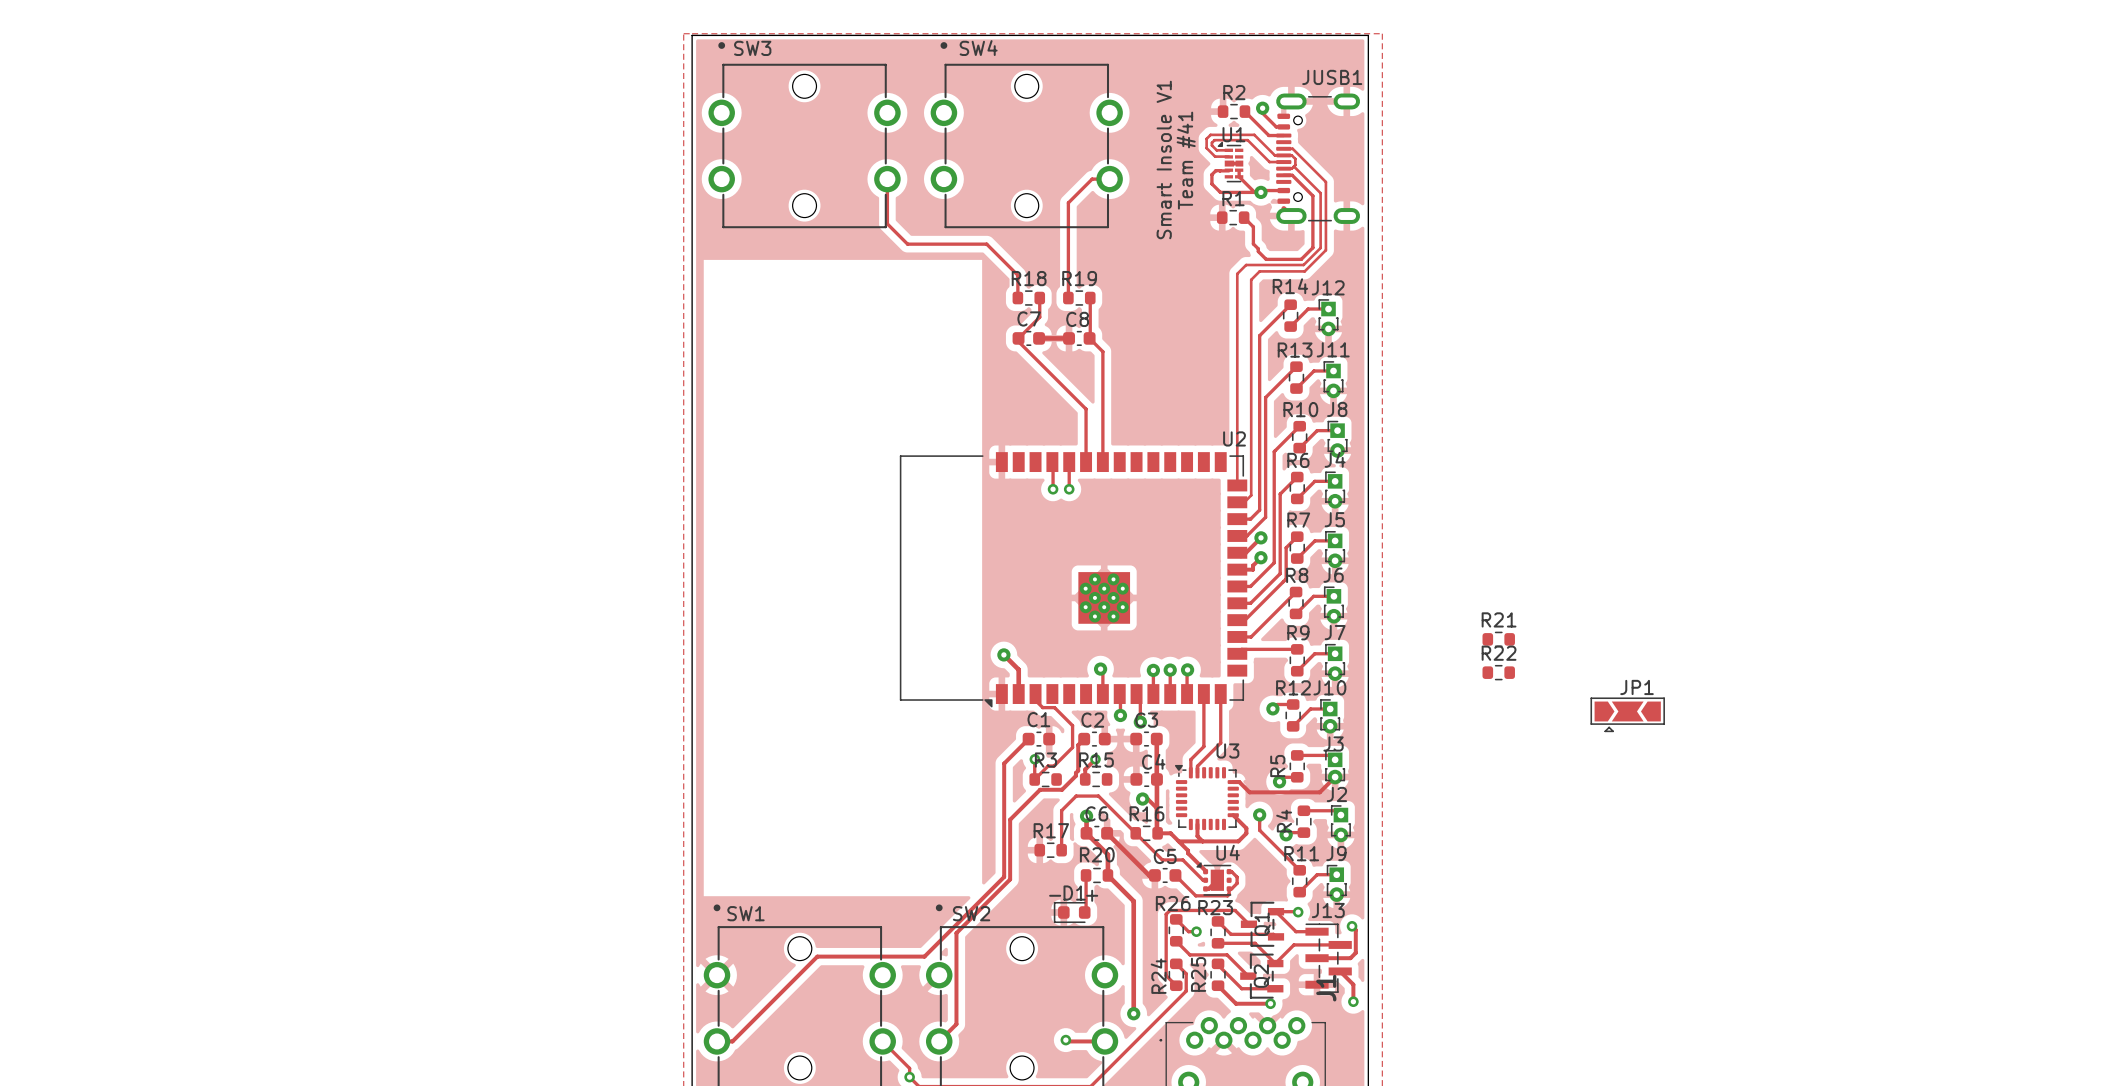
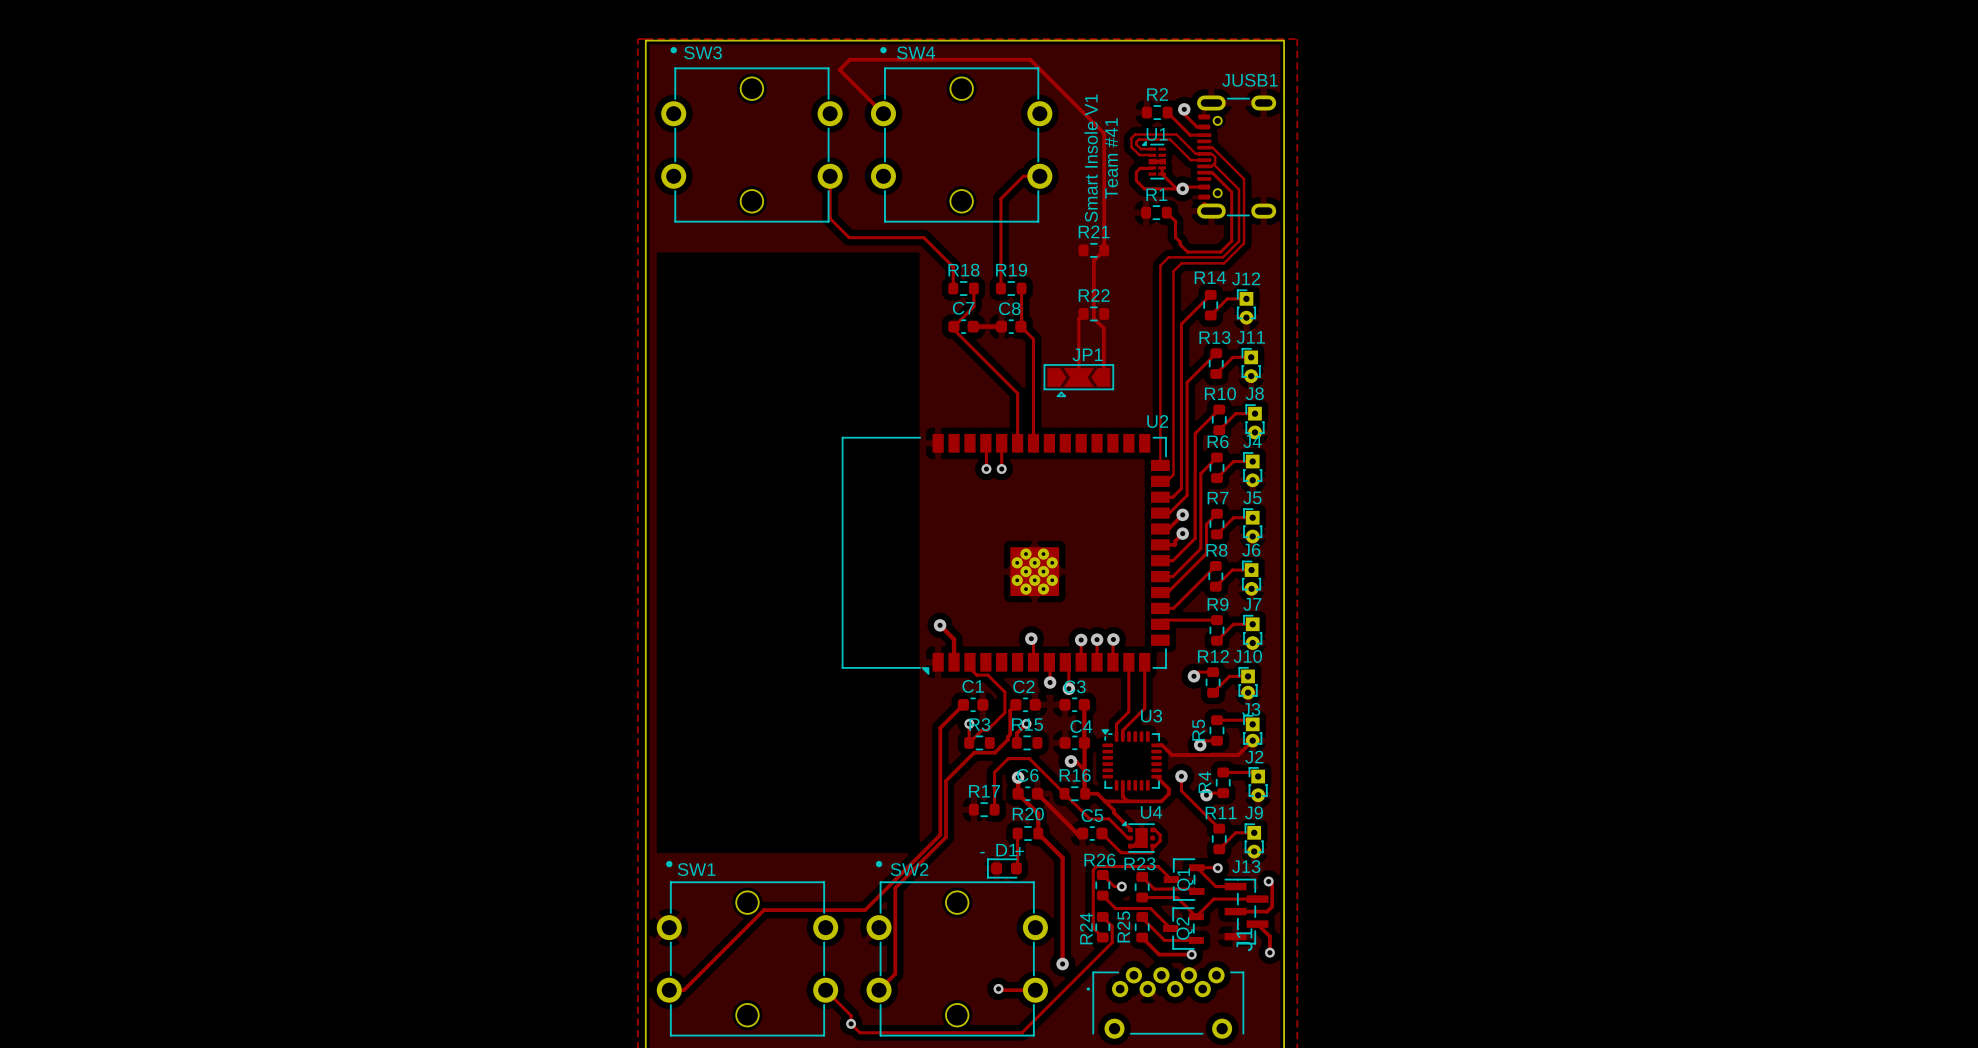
track: none -> (883, 113) (839, 69) (849, 59) (1030, 59) (1104, 133) (1104, 250) (1093, 260) (1093, 318) (1103, 328) (1103, 377)
track: none -> (1083, 313) (1078, 318) (1078, 377)
R21 position: (1498, 639) -> (1093, 250)
R22 position: (1498, 672) -> (1093, 313)
JP1 position: (1627, 714) -> (1078, 380)

